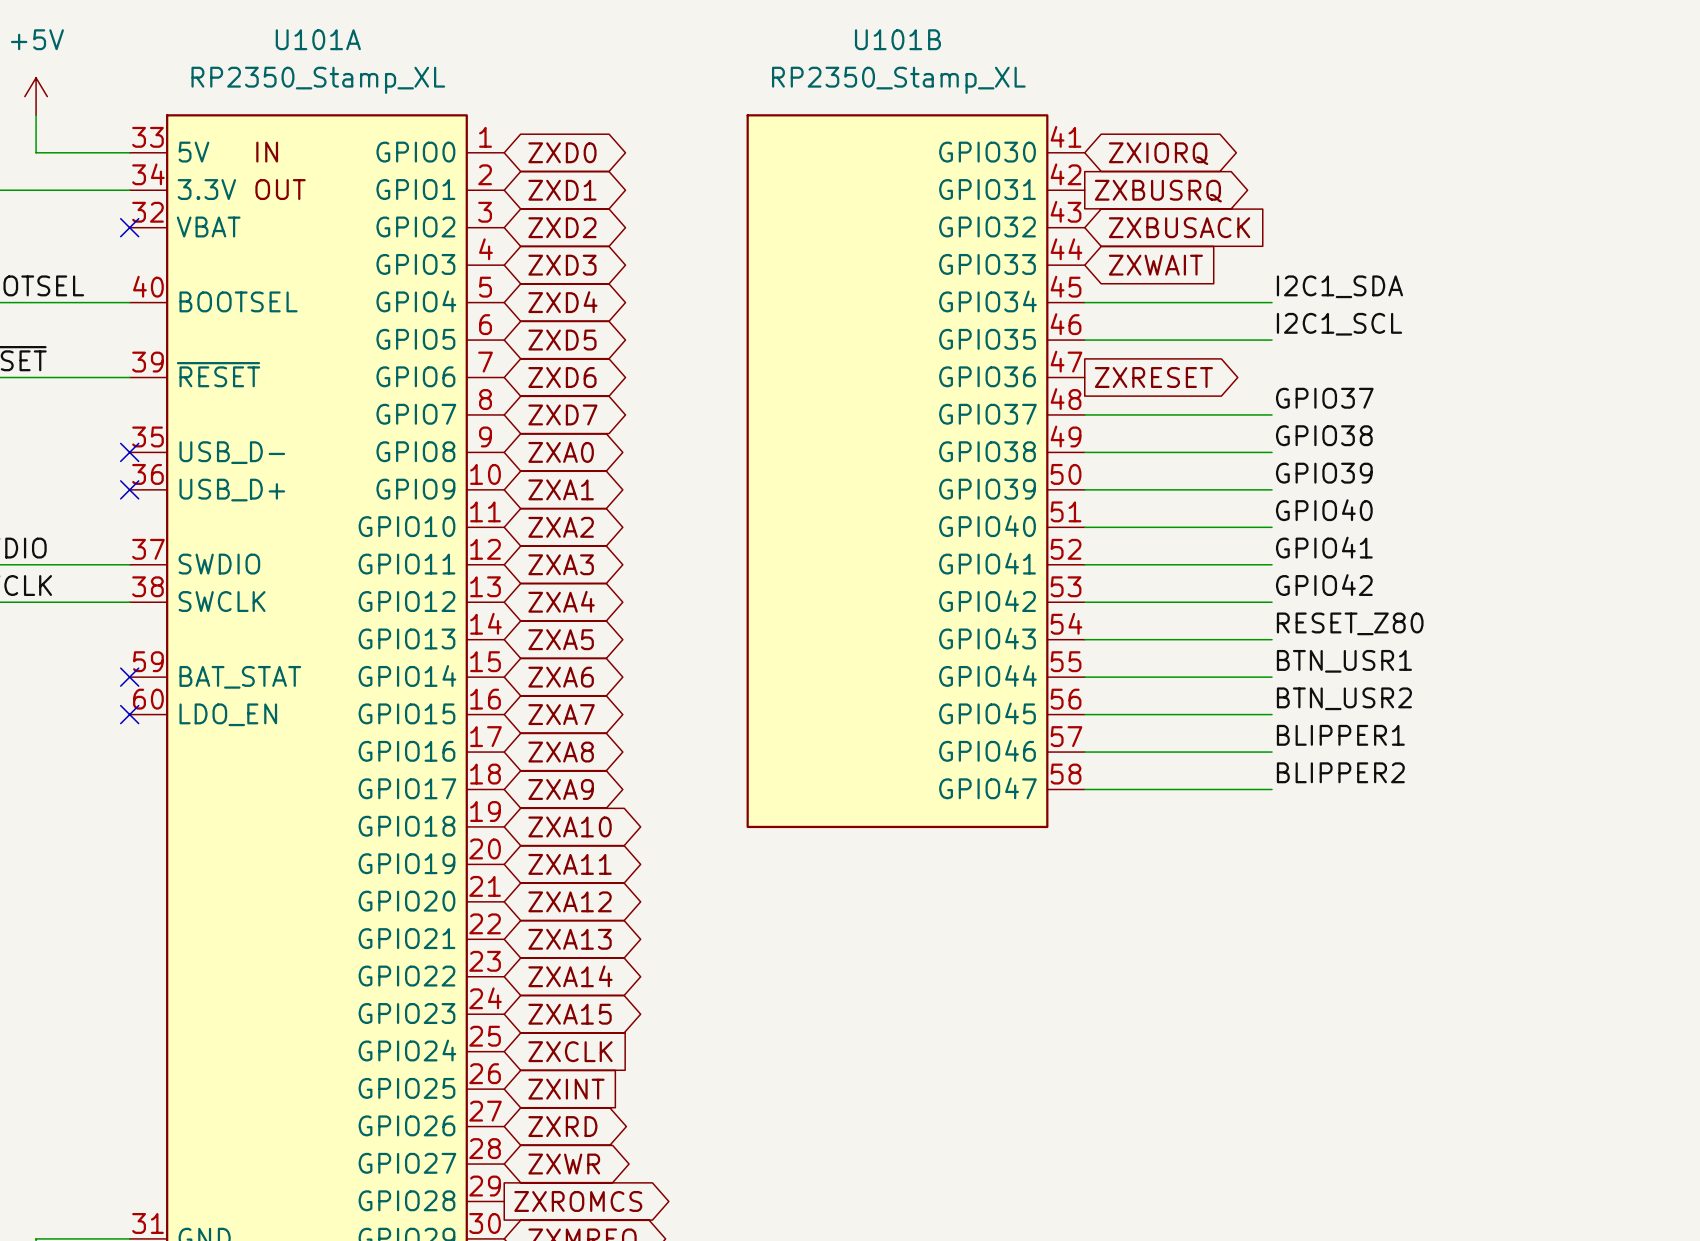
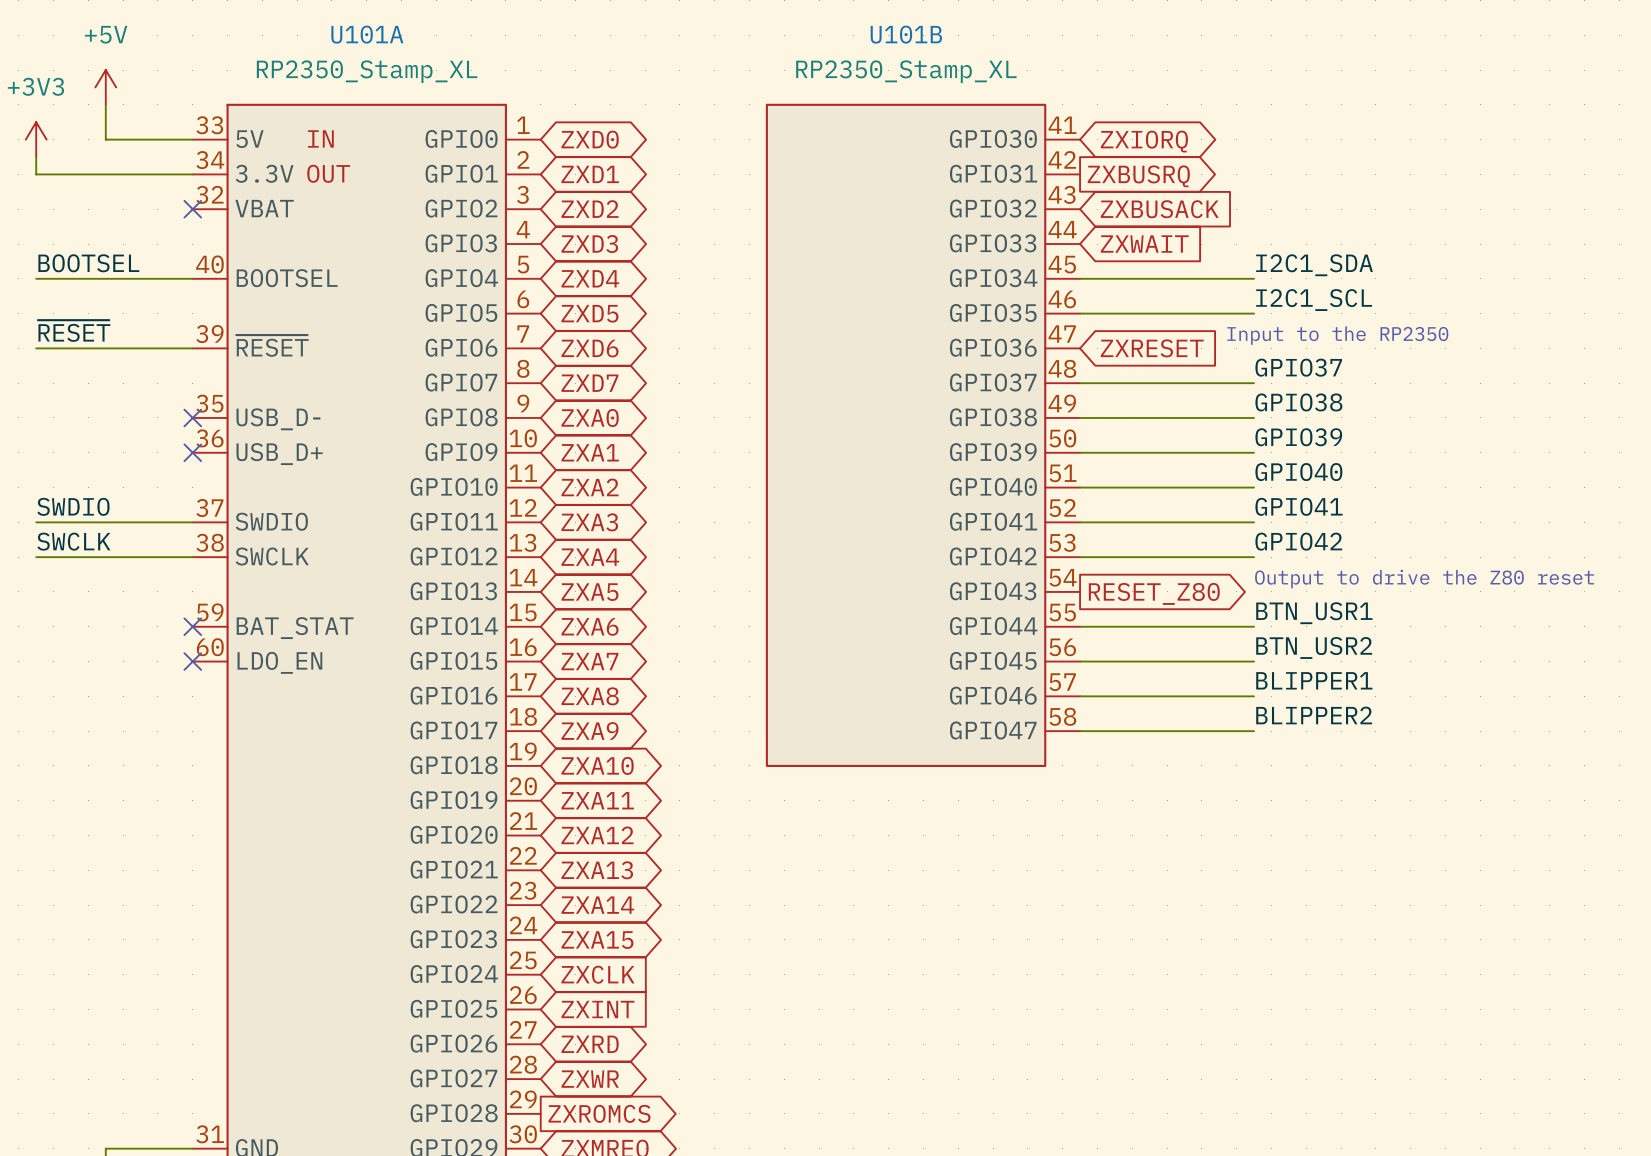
text: none -> Input to the RP2350 (1337, 335)
global label shape: output (1153, 377) -> input (1152, 348)
label: RESET_Z80 (1350, 623) -> none
text: none -> Output to drive the Z80 reset (1424, 579)
wire: (1084, 639) (1272, 639) -> none
global label: none -> RESET_Z80 (1154, 593)

